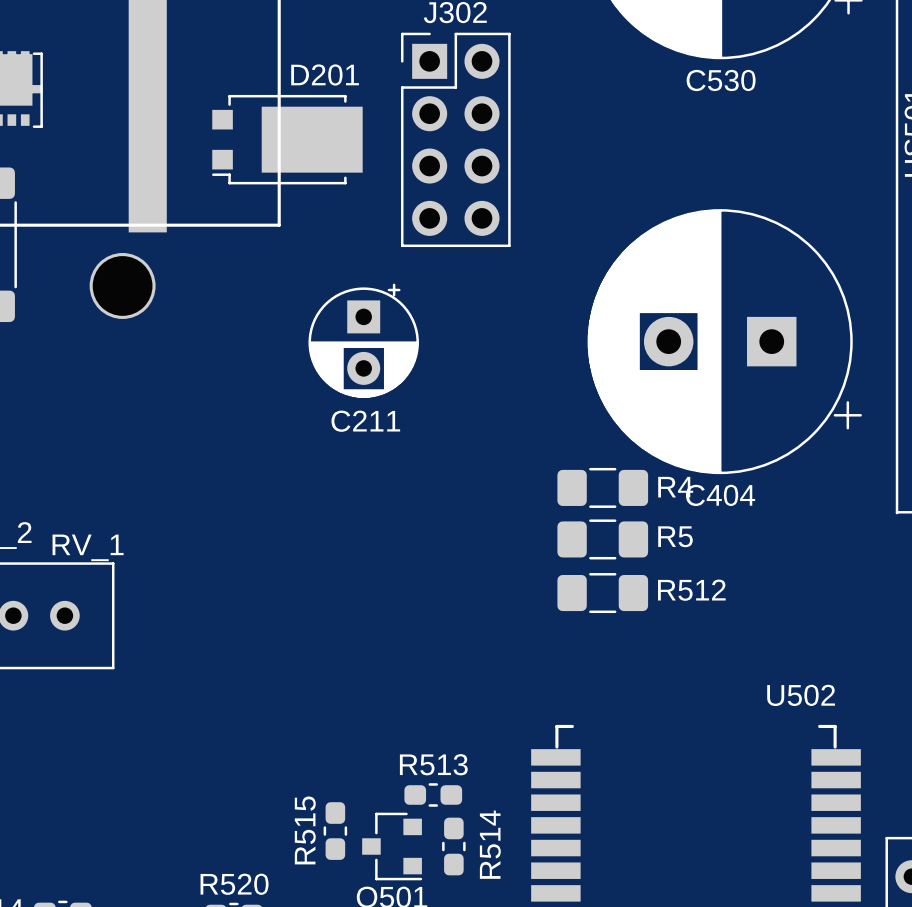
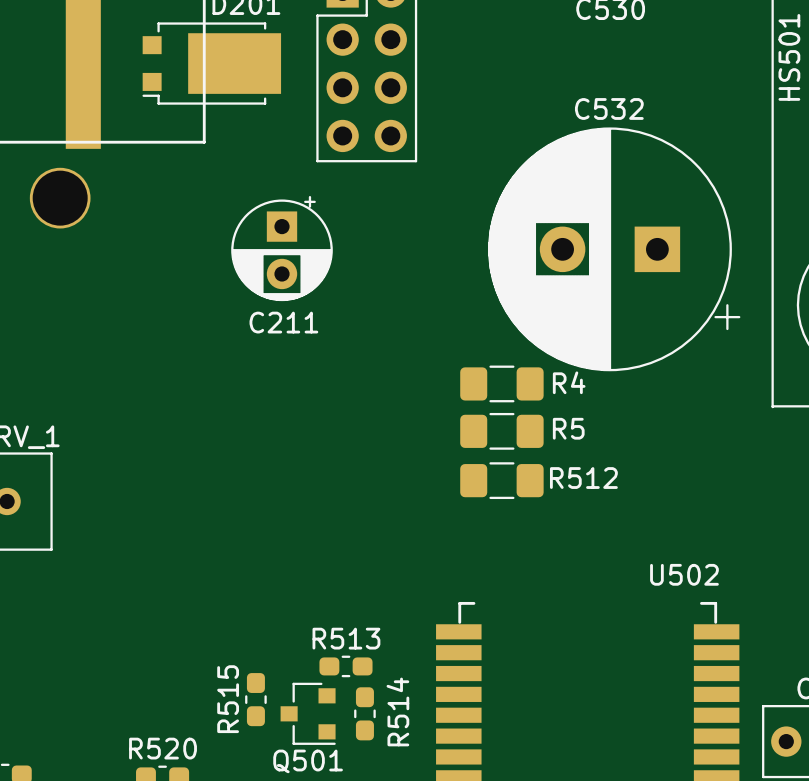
C404 name: C404 (720, 495) -> C532 (609, 108)

